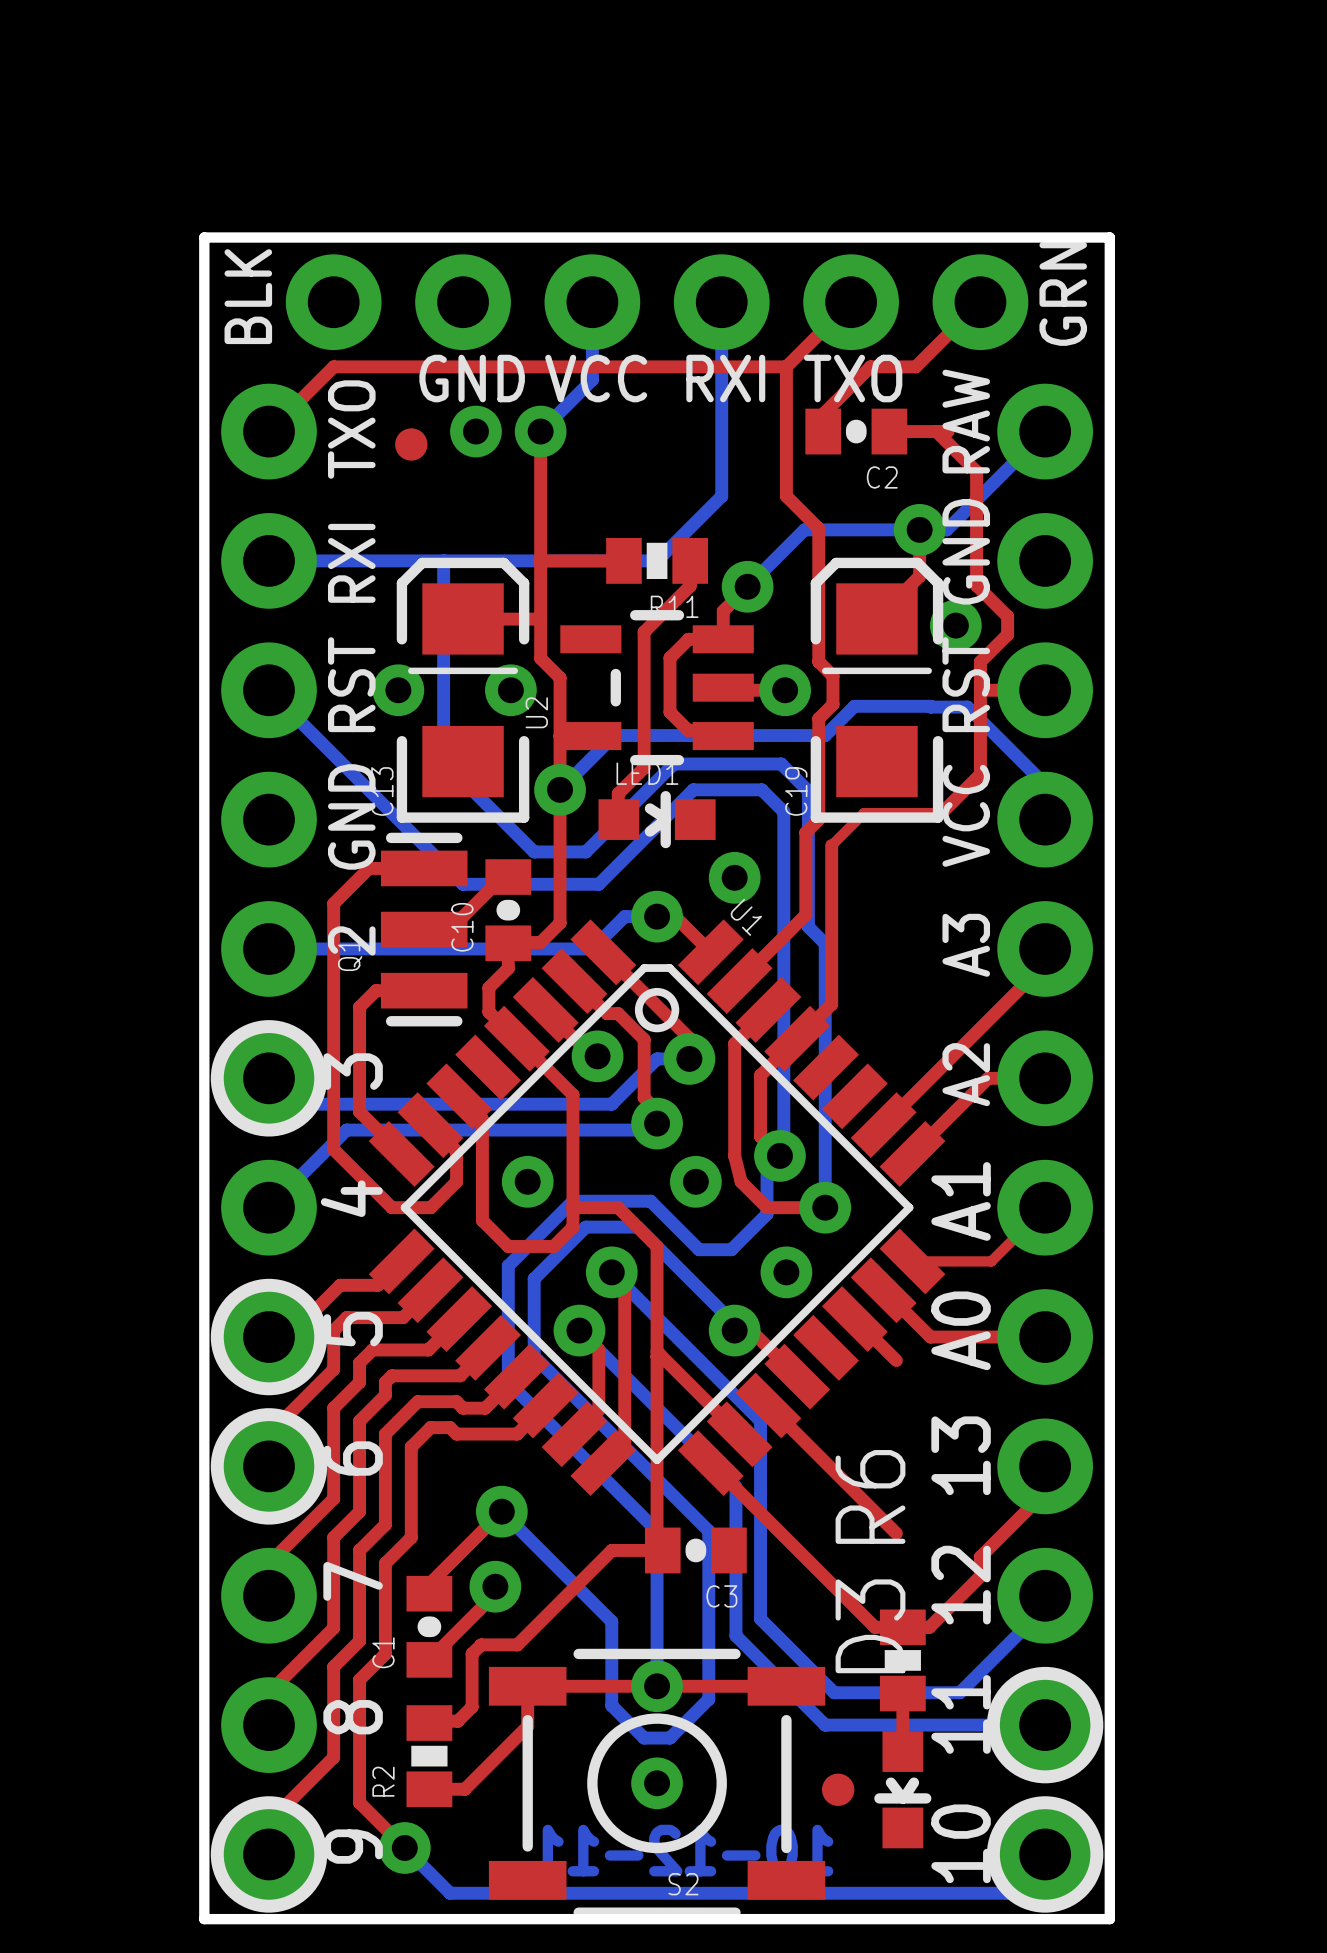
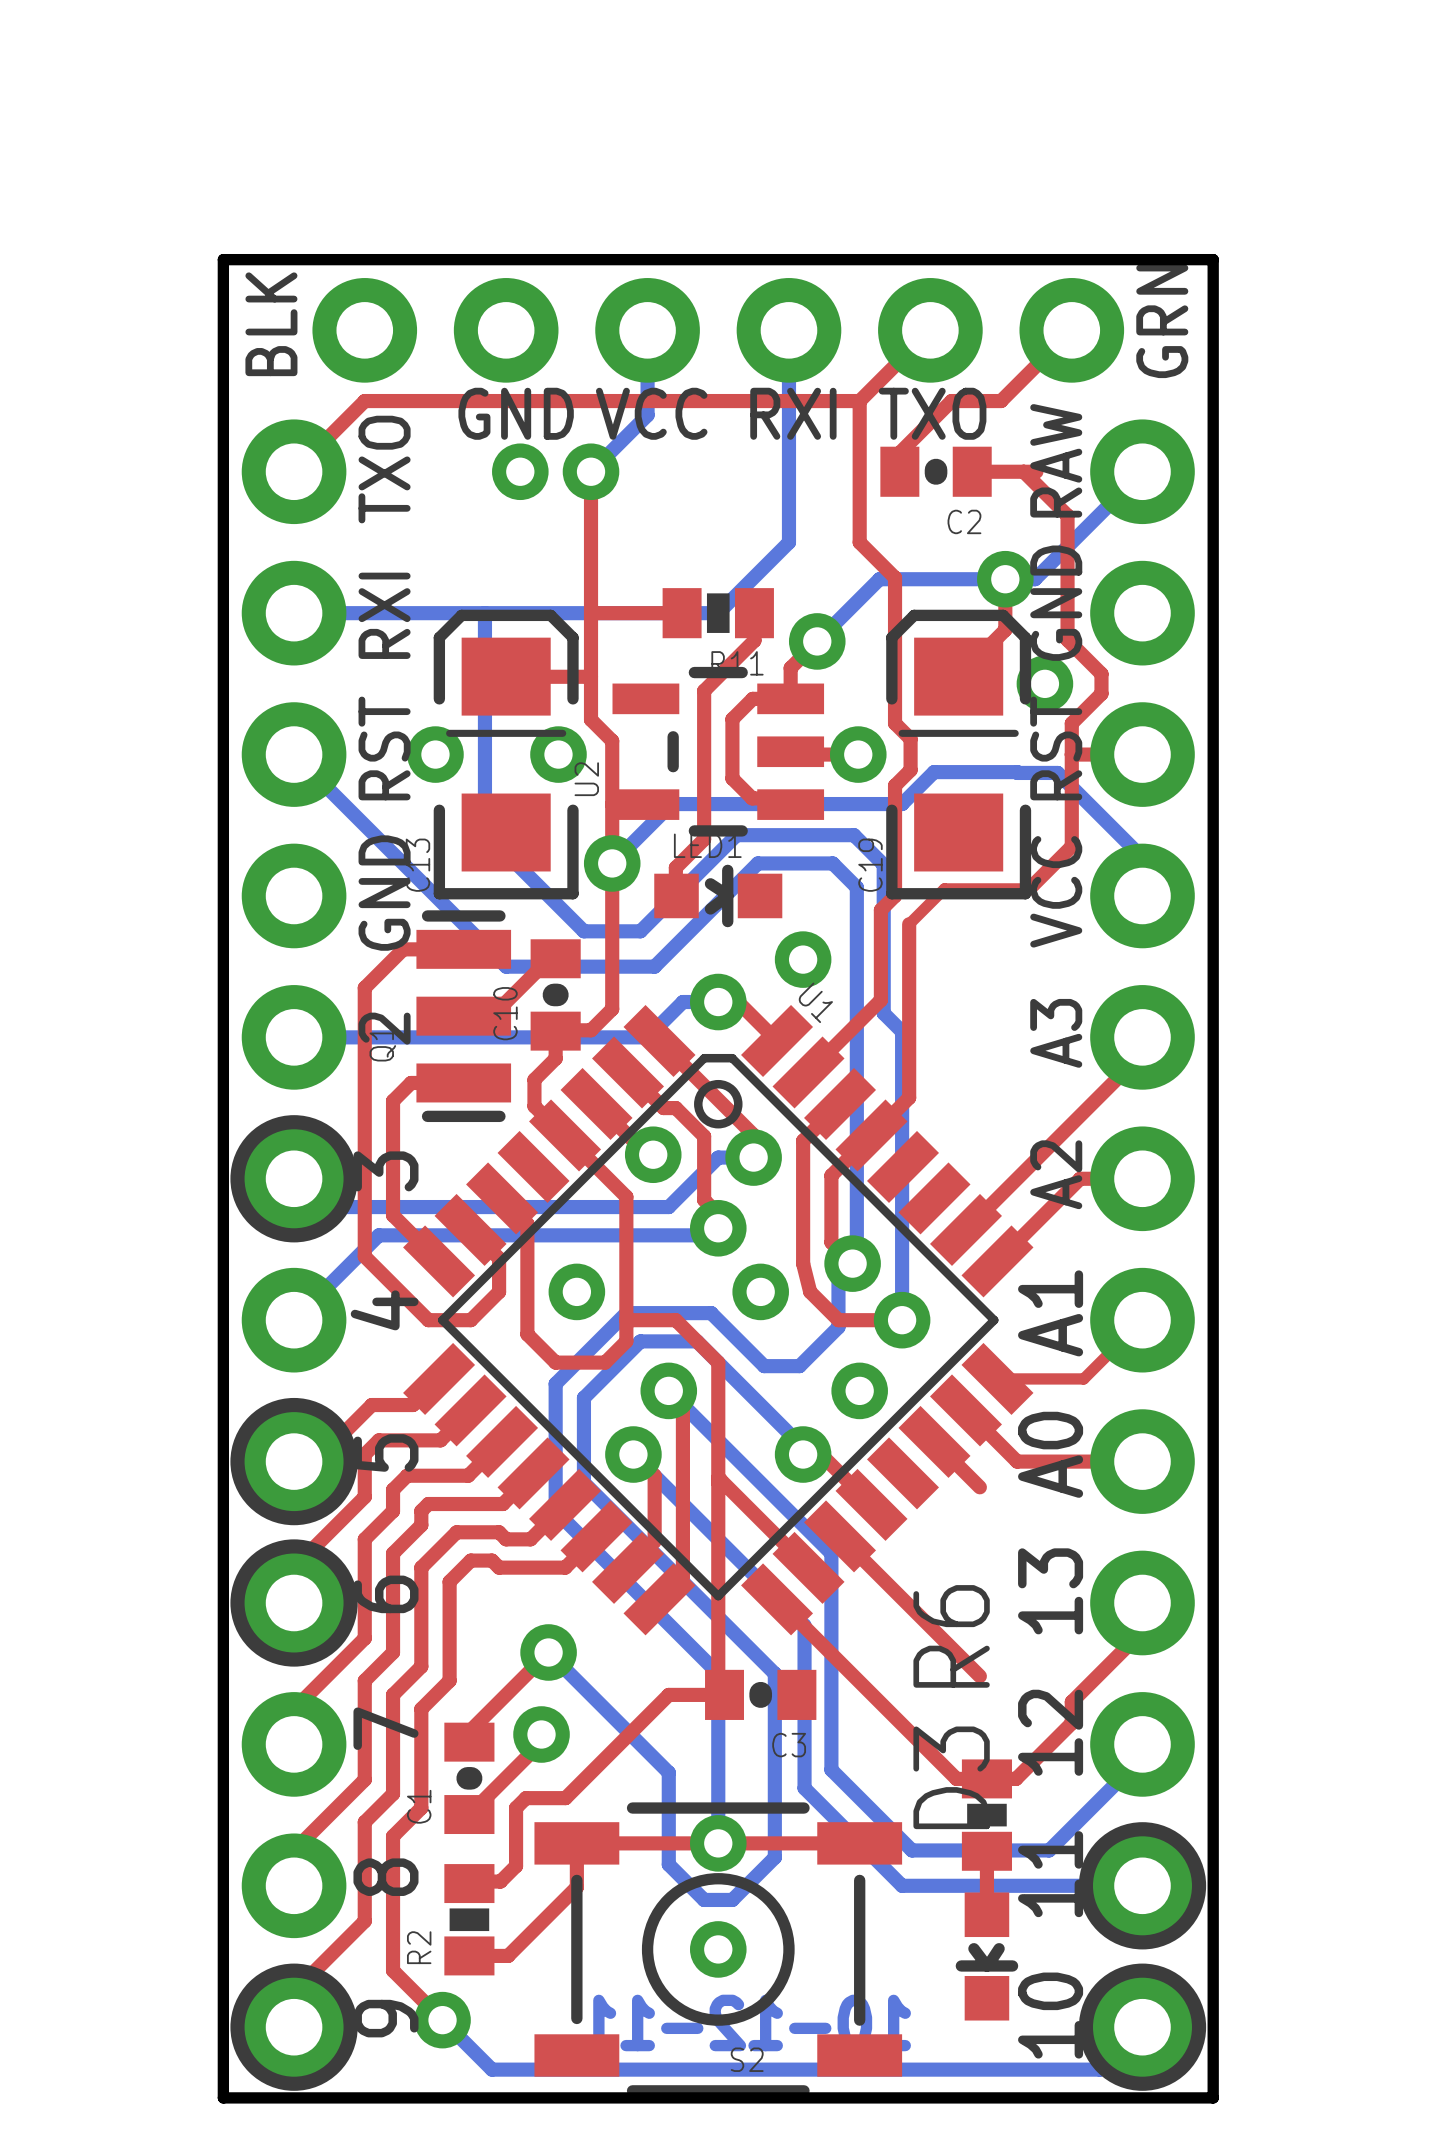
part: (411, 444) -> none
part: (838, 1789) -> none

